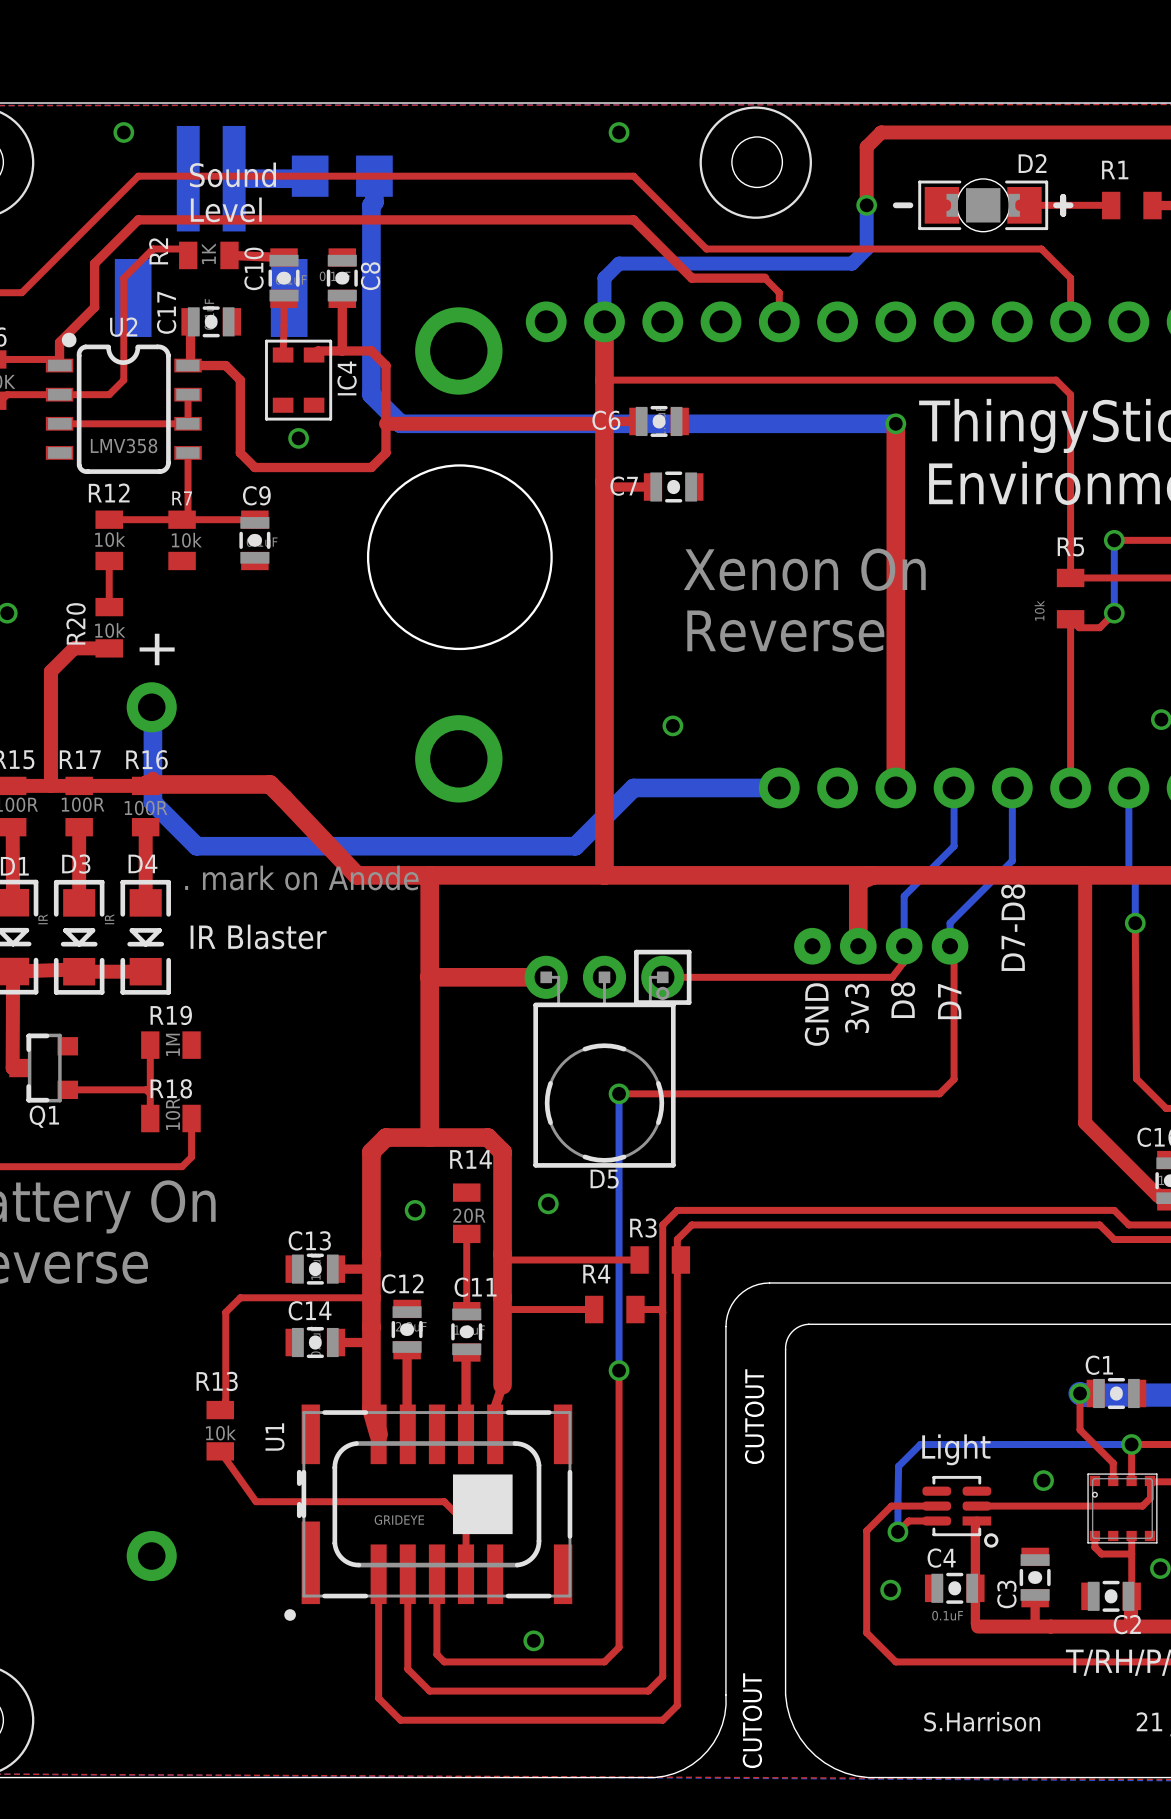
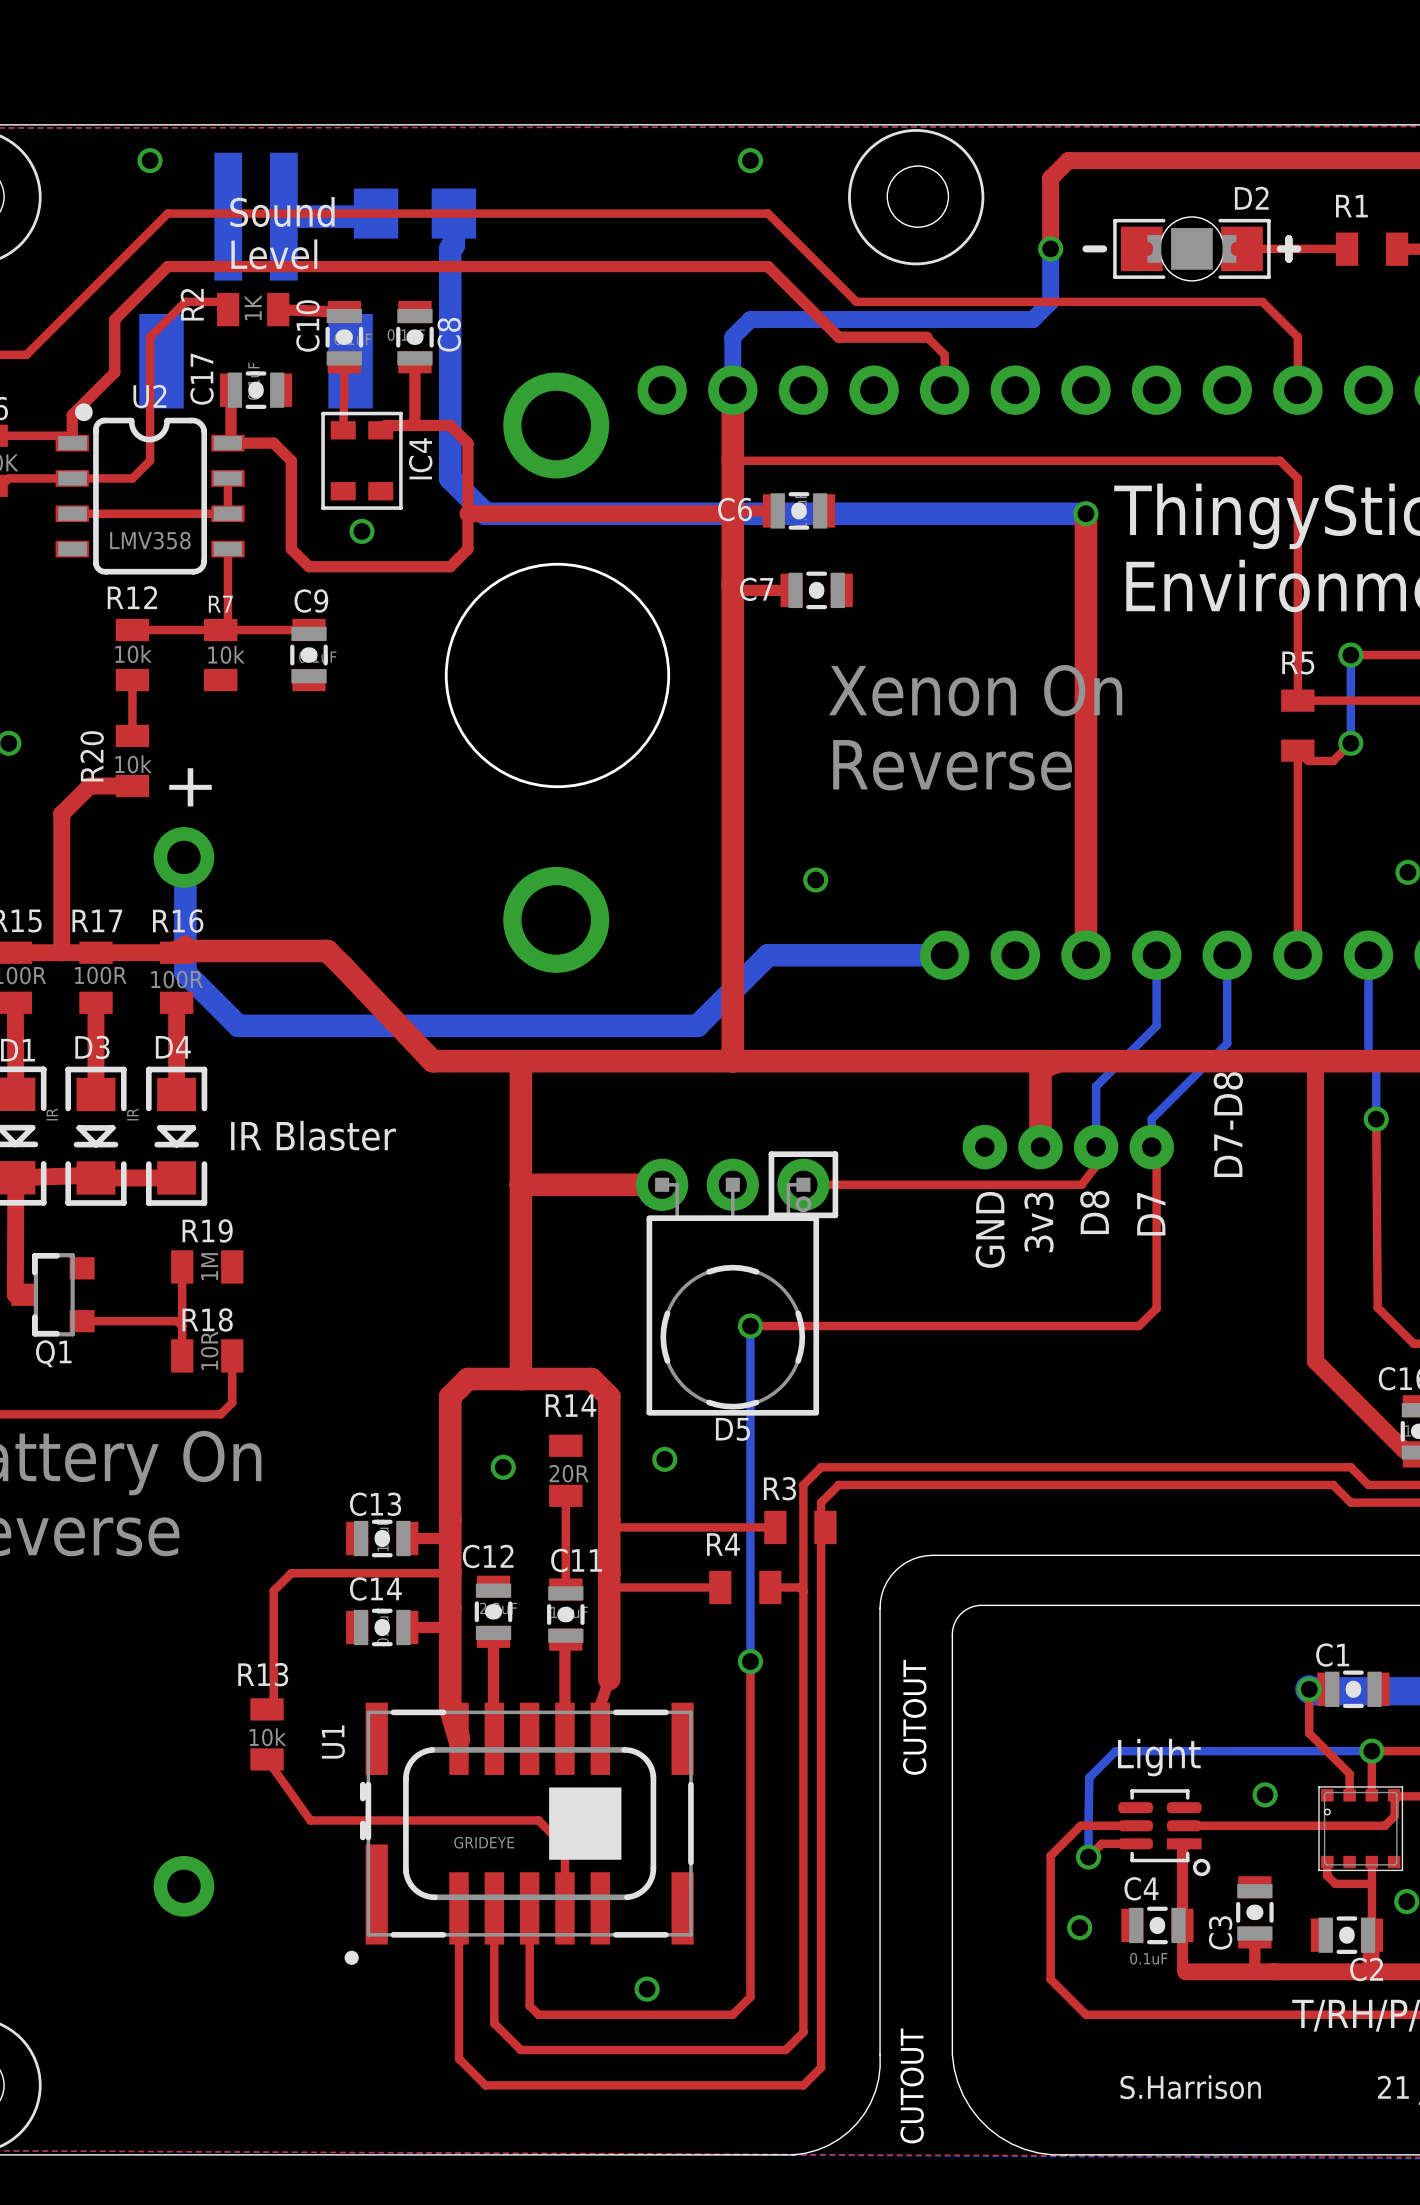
R5 value: 10k (1039, 610) -> none
text: . mark on Anode (301, 878) -> none

